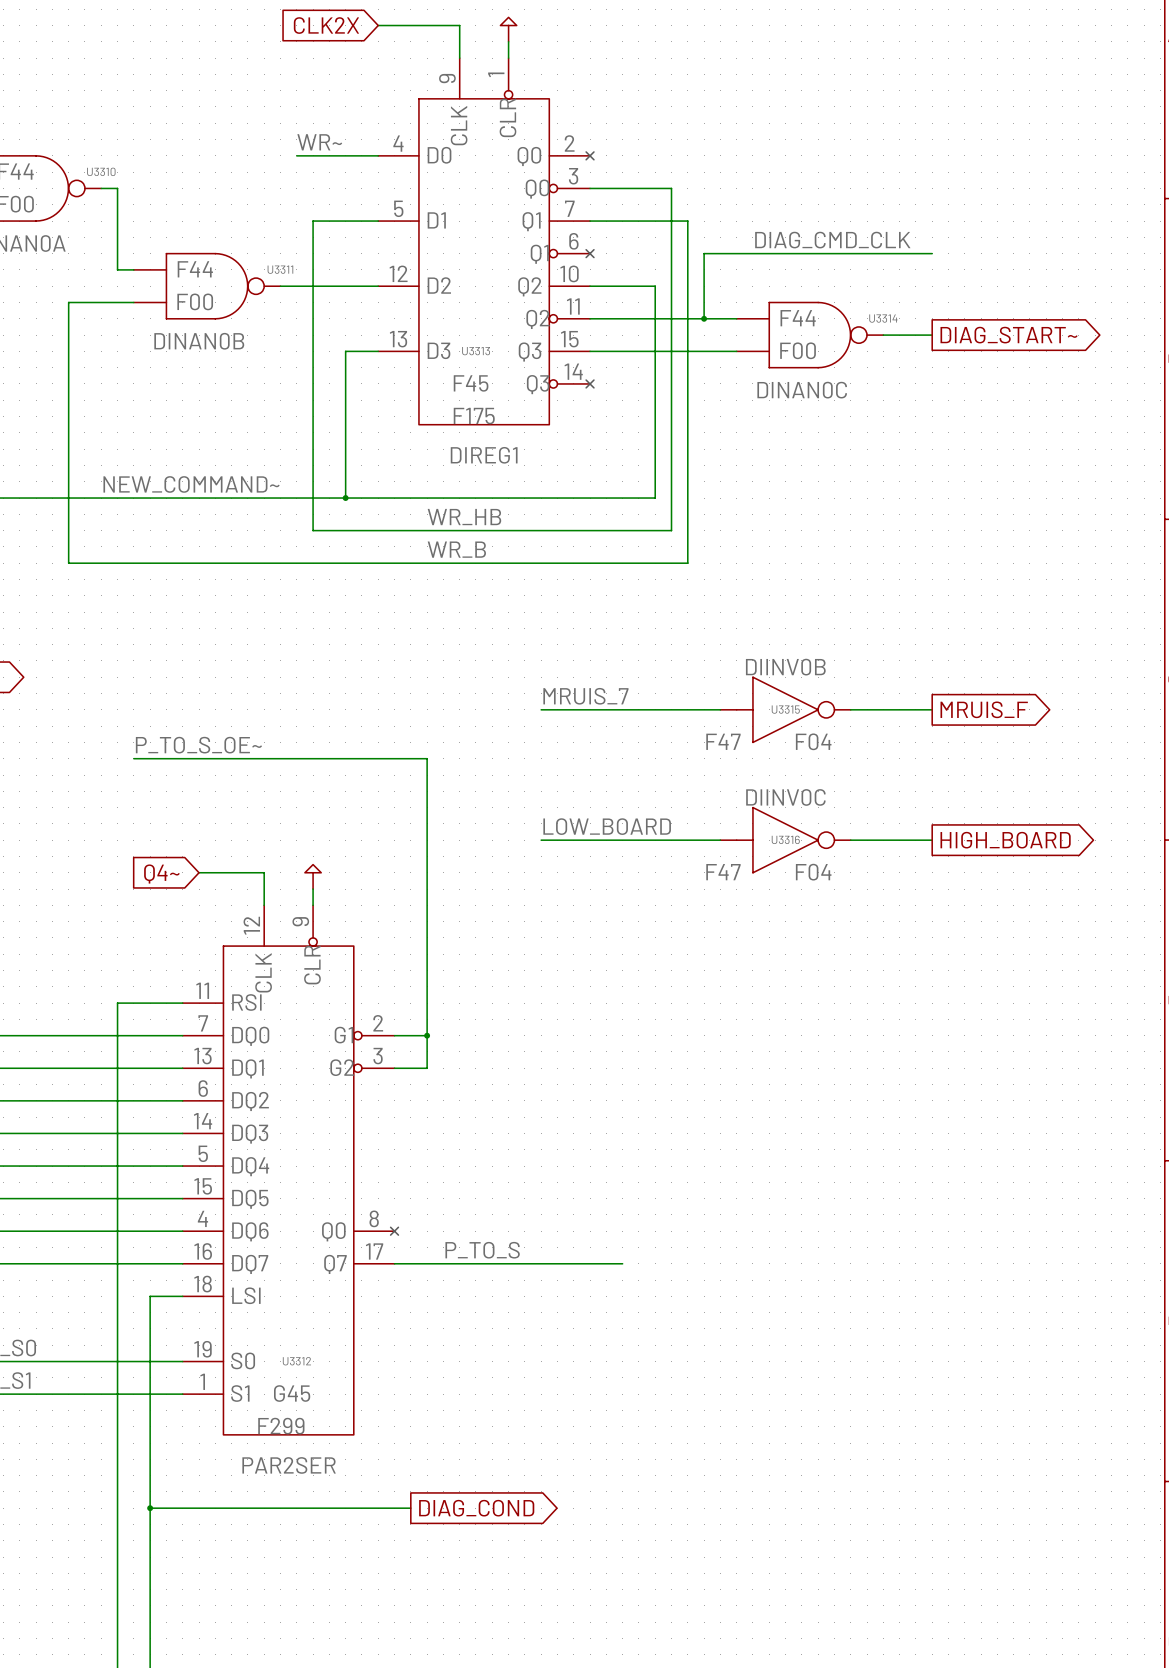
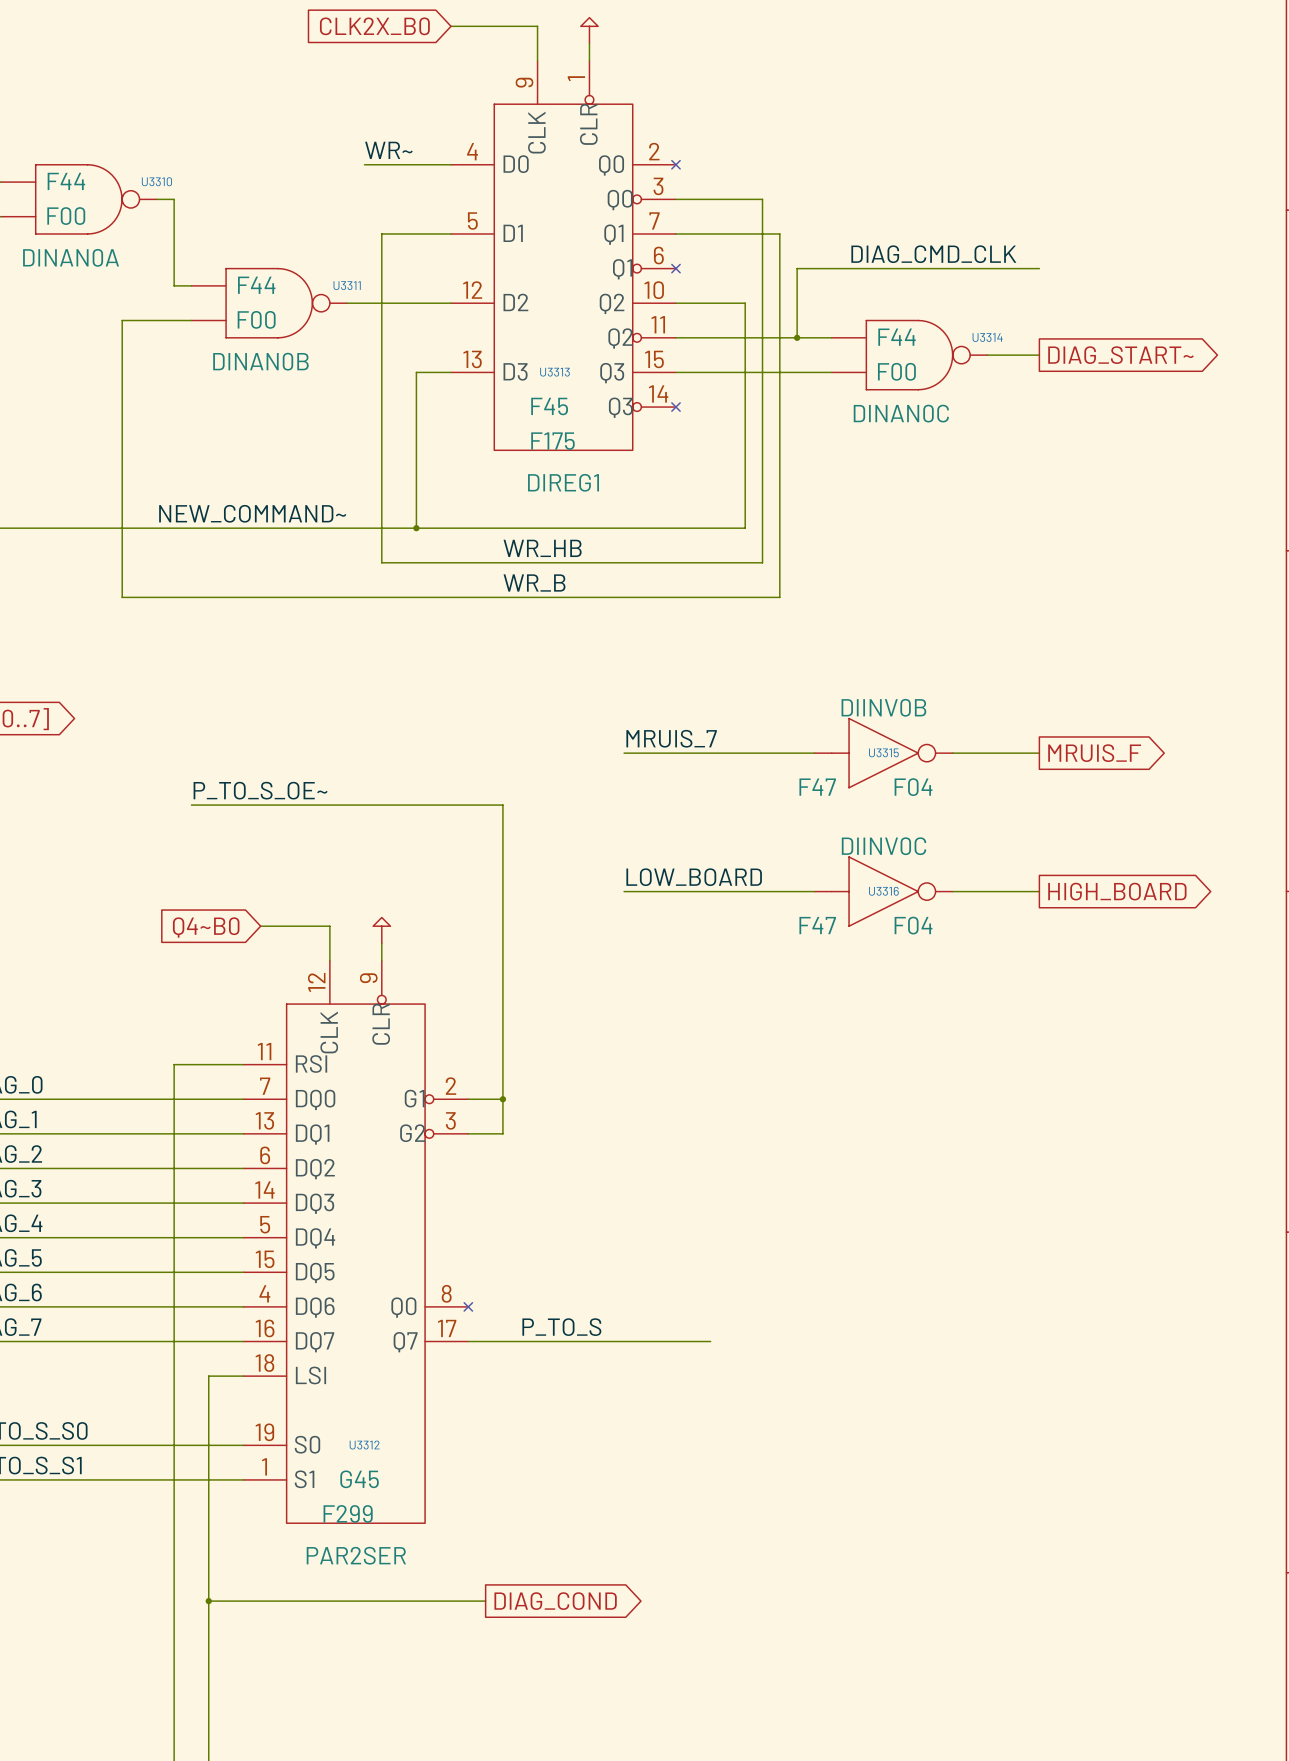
global label: CLK2X (326, 25) -> CLK2X_B0 (374, 26)
global label: Q4~ (161, 874) -> Q4~B0 (206, 927)

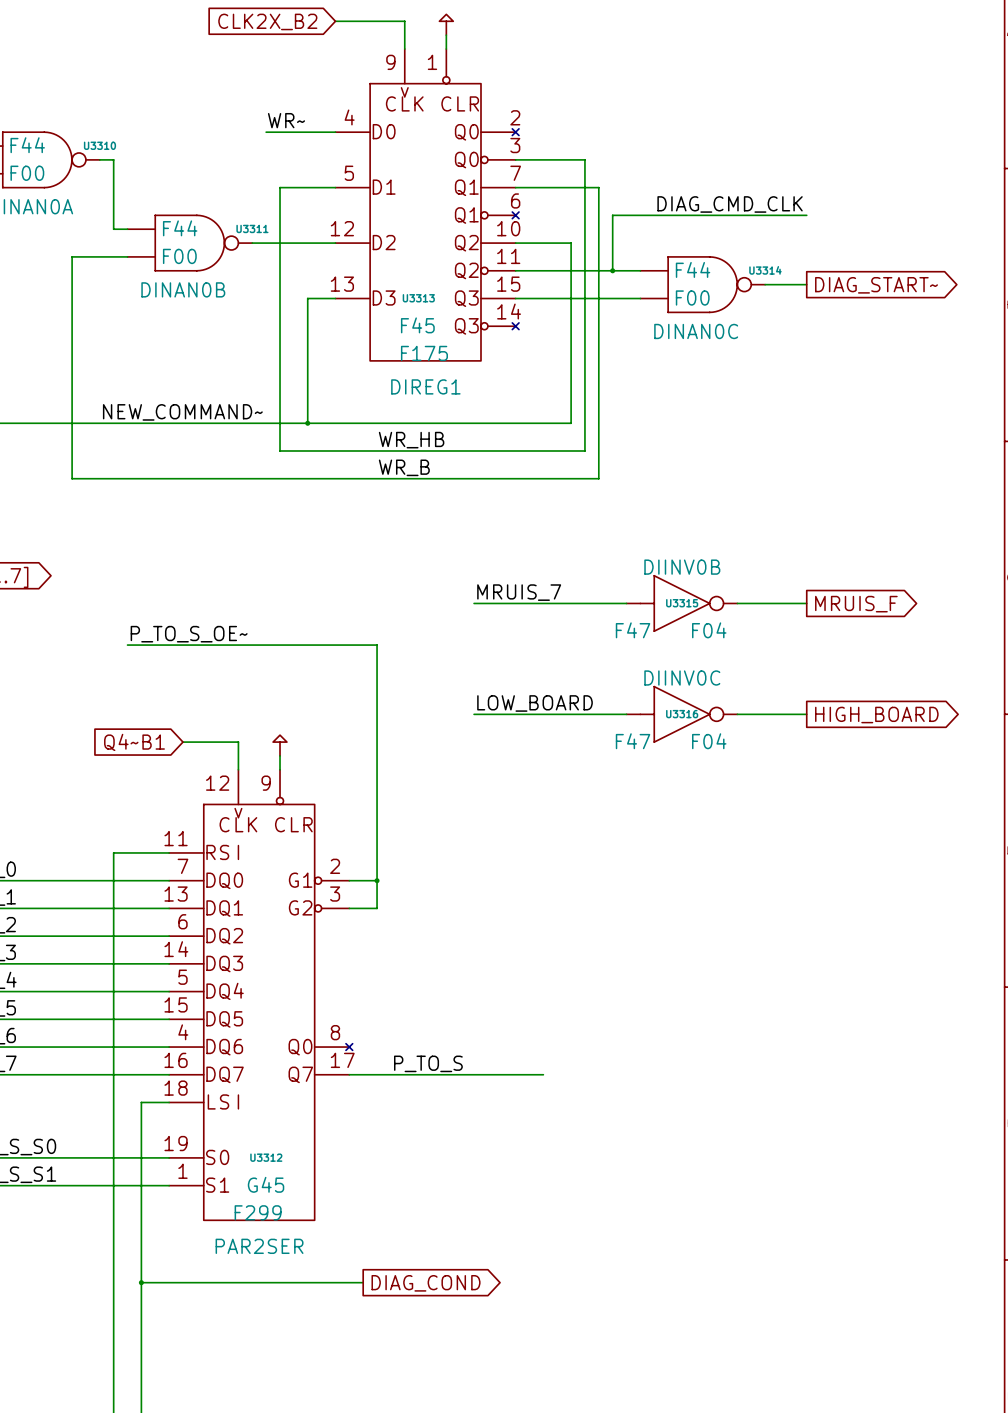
global label: CLK2X_B0 (374, 26) -> CLK2X_B2 (267, 21)
U3313 symbol: [451, 60, 676, 451] -> [335, 49, 516, 361]
global label: Q4~B0 (206, 927) -> Q4~B1 (134, 742)
U3312 symbol: [243, 960, 469, 1524] -> [169, 769, 350, 1221]

